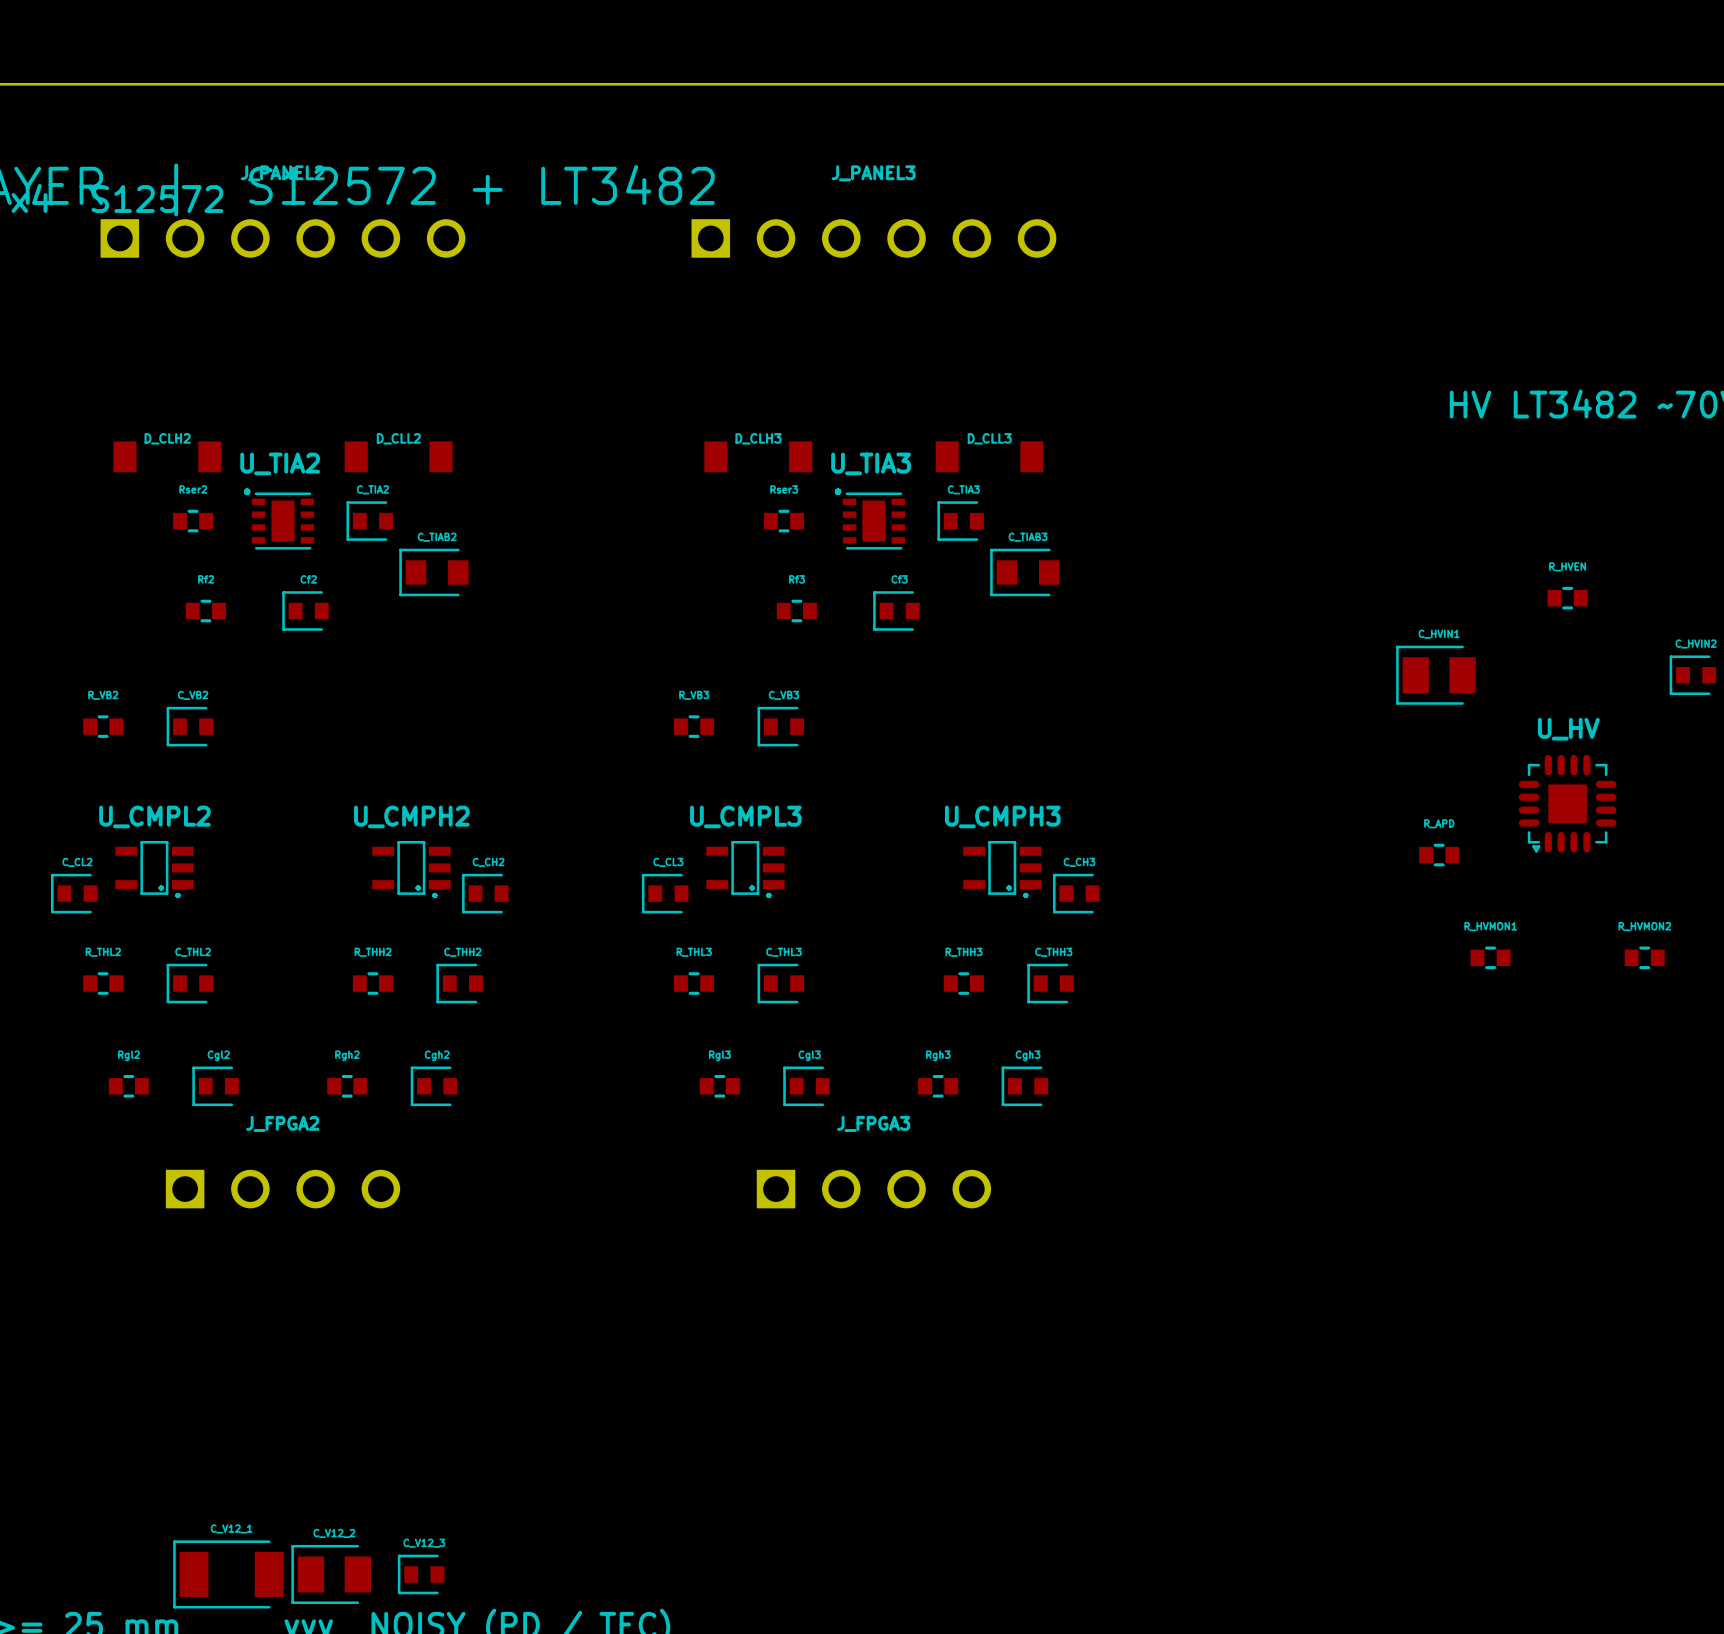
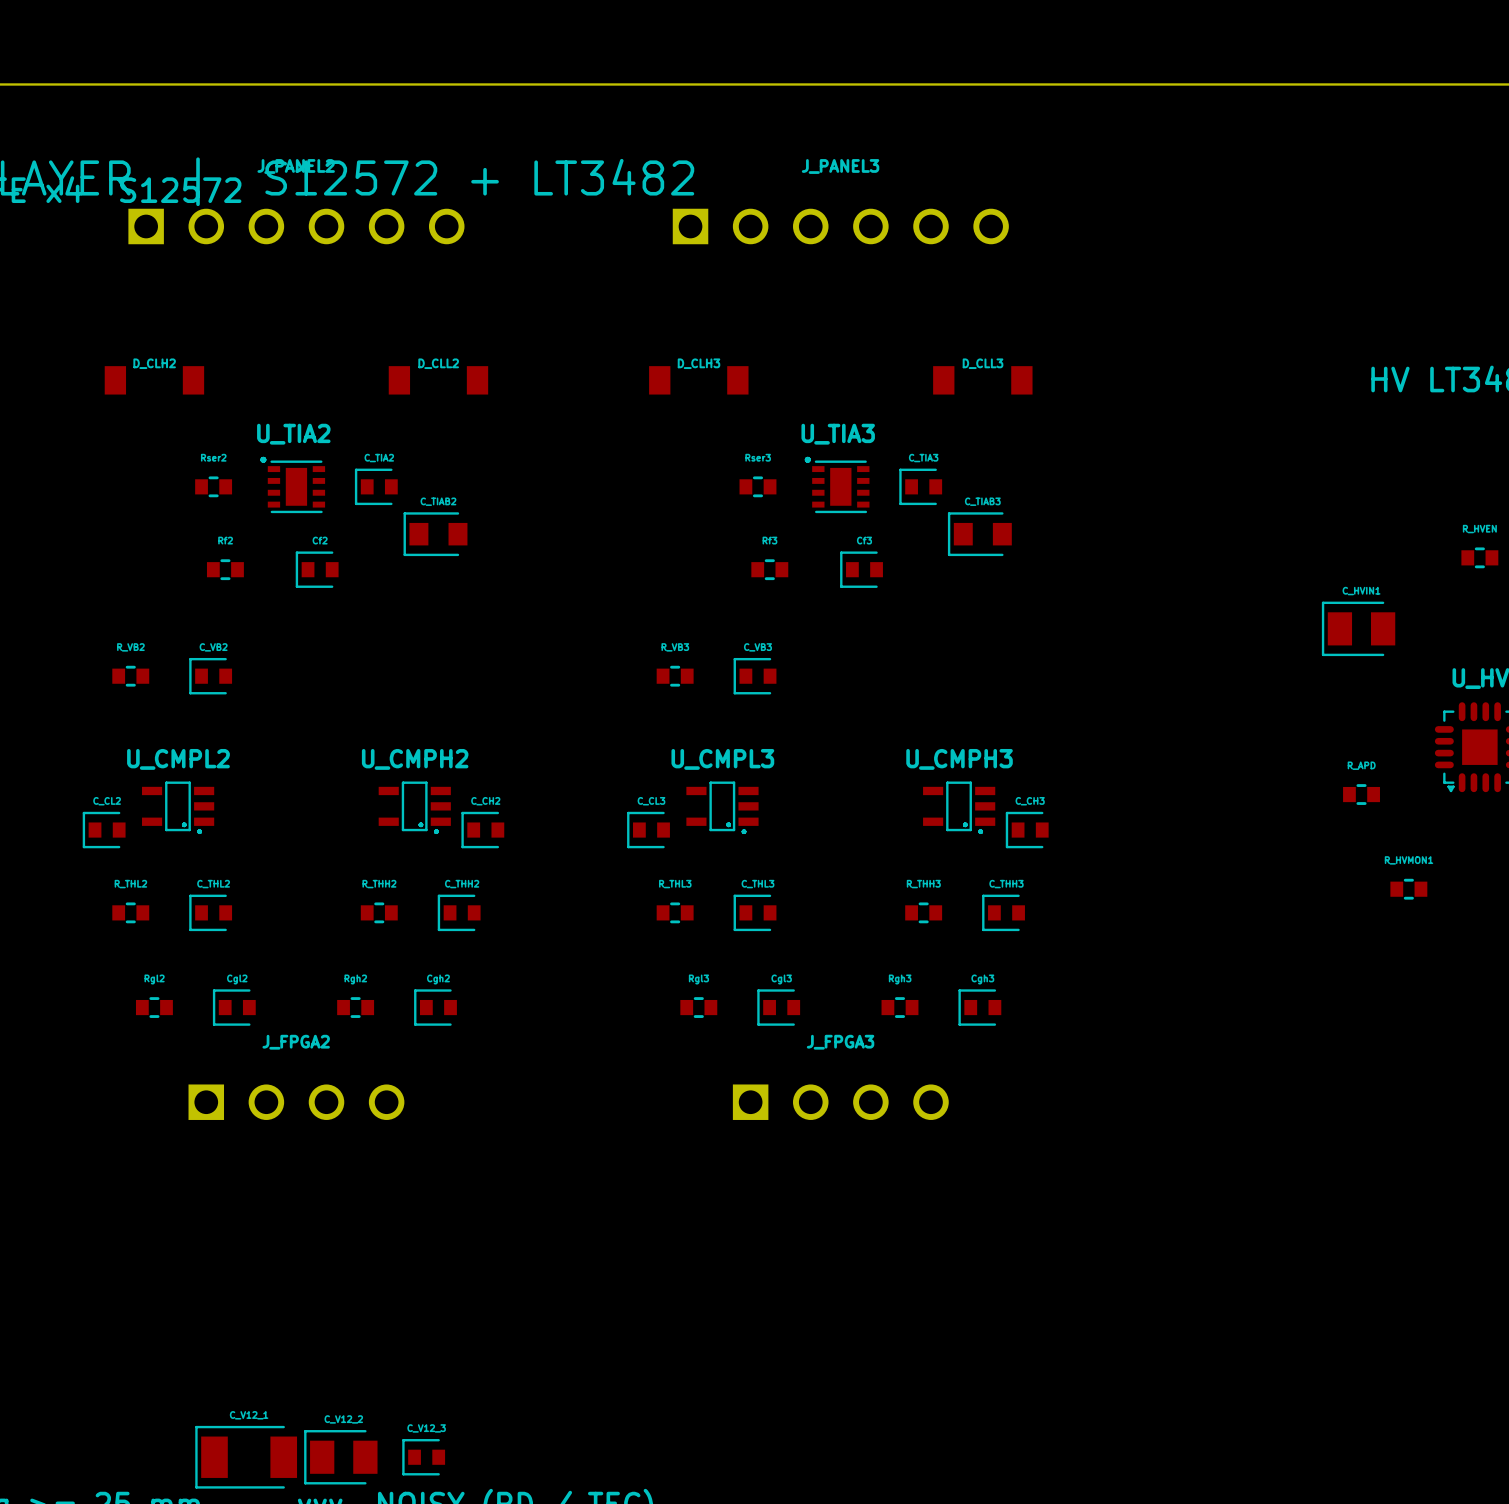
D_CLH2 position: (167, 456) -> (154, 380)
D_CLL2 position: (398, 456) -> (438, 380)
D_CLH3 position: (758, 456) -> (698, 380)
D_CLL3 position: (989, 456) -> (982, 380)

